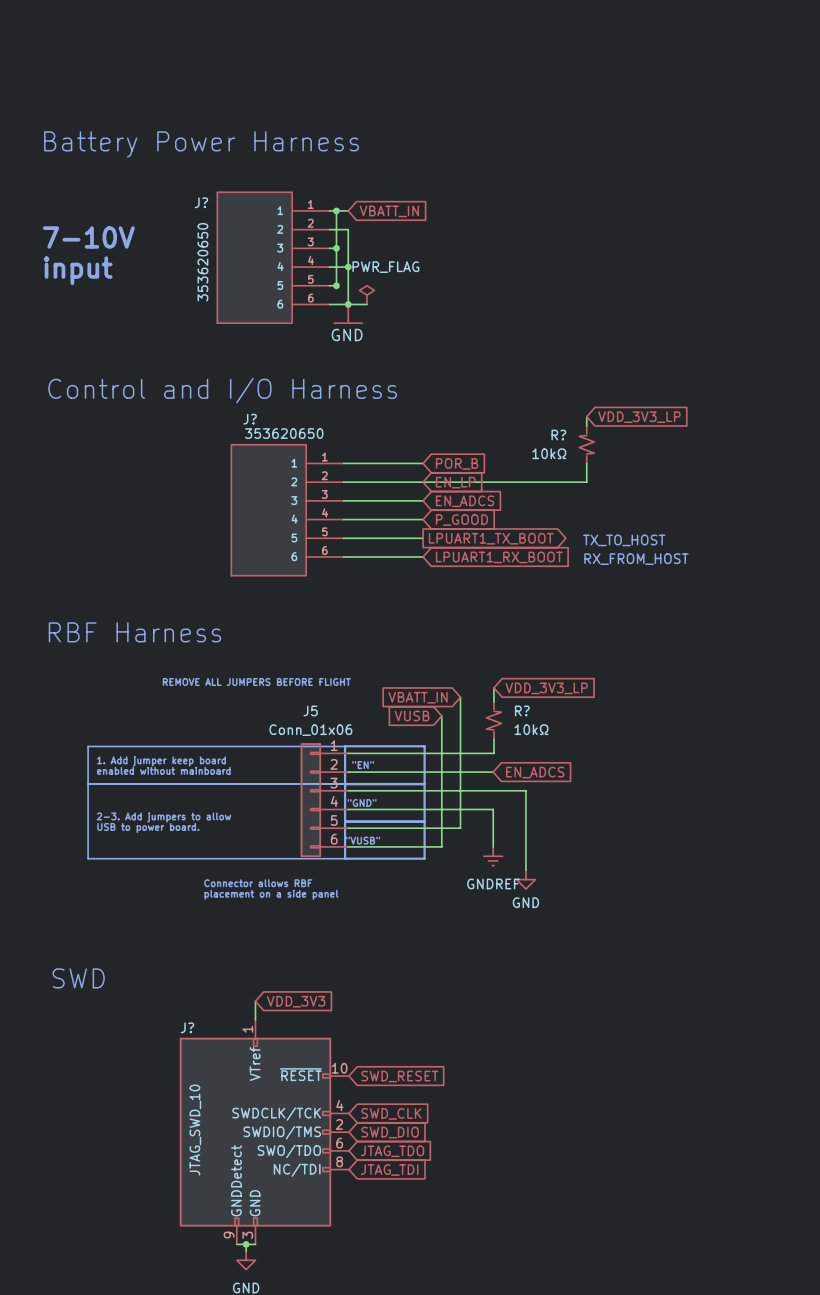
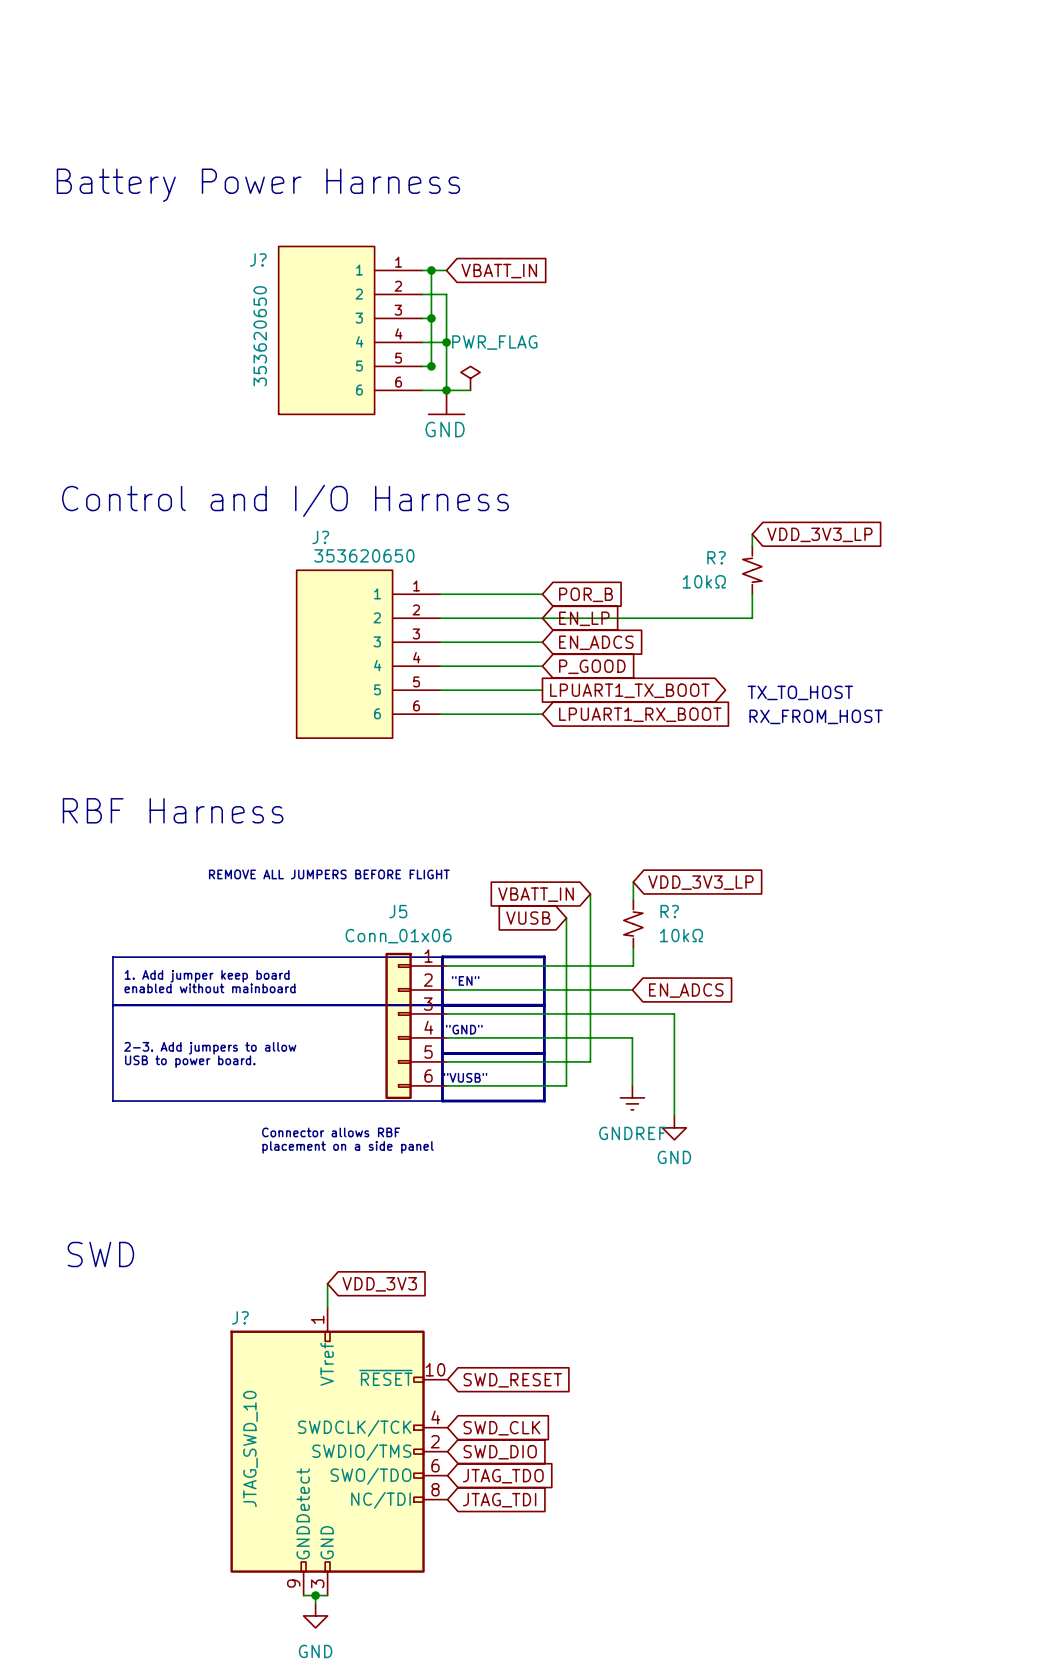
text: 7-10V (88, 237) -> none
text: input (78, 270) -> none

